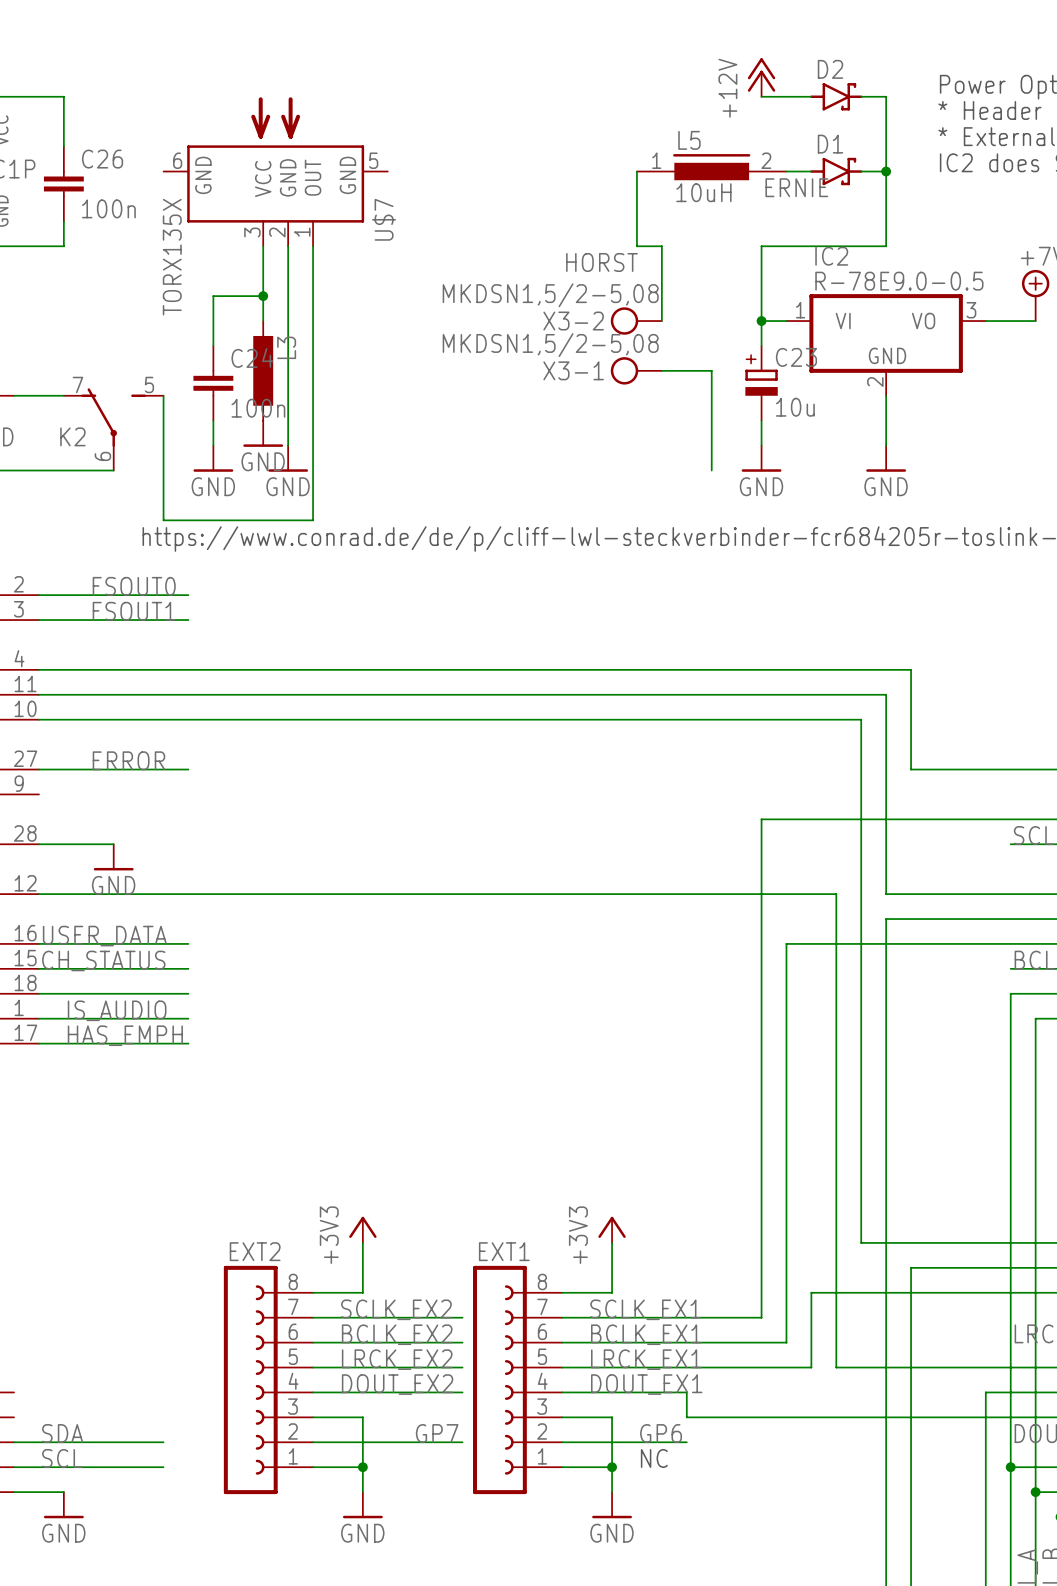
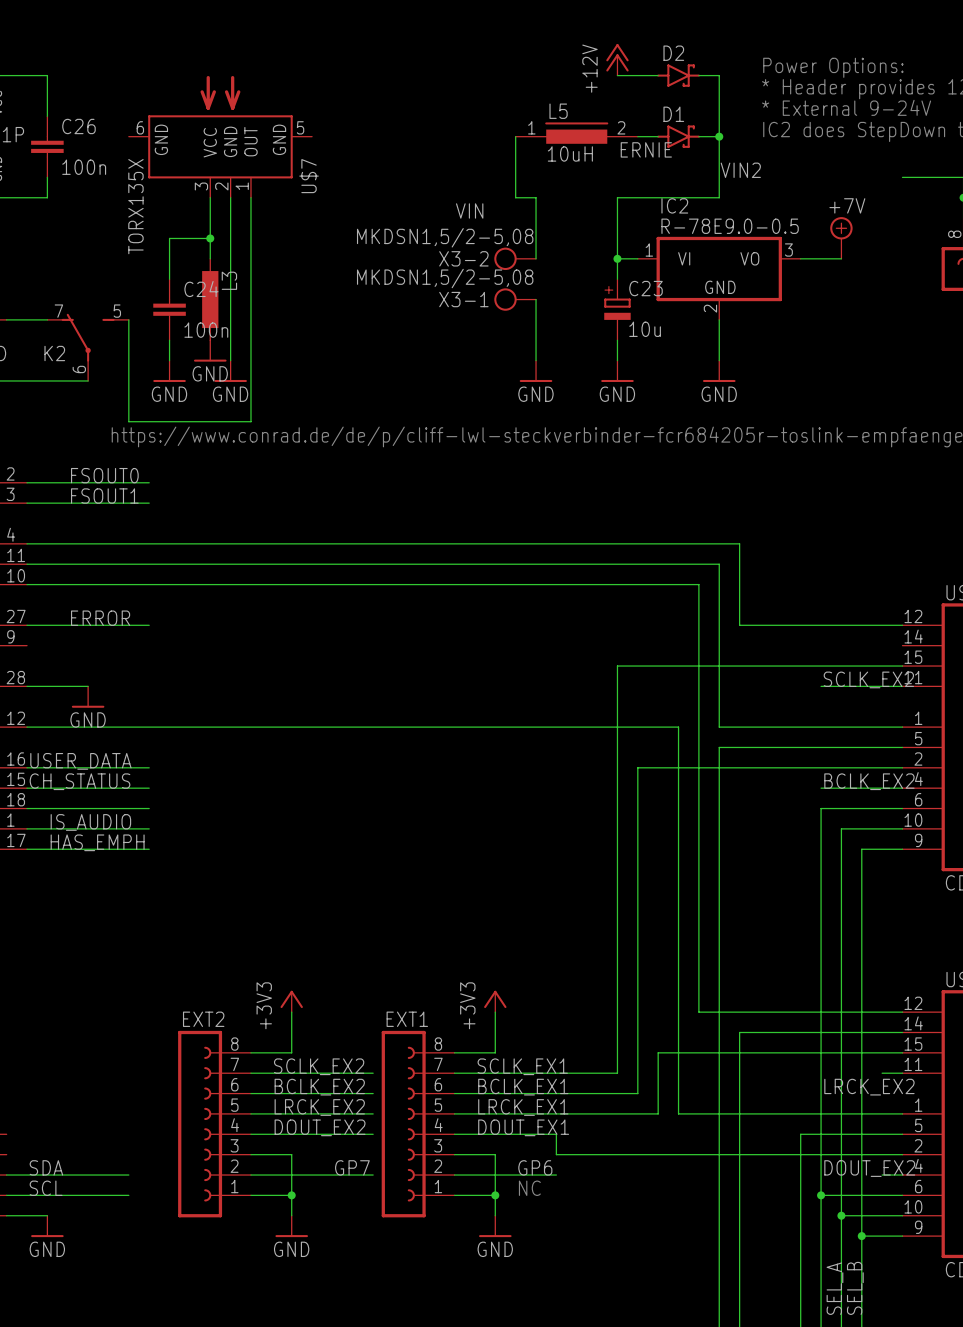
label: none -> VIN2 (740, 170)
label: HORST (602, 262) -> VIN (469, 210)
wire: (661, 370) (711, 370) (711, 470) -> (536, 299) (536, 360)
power symbol: none -> GND (536, 371)

